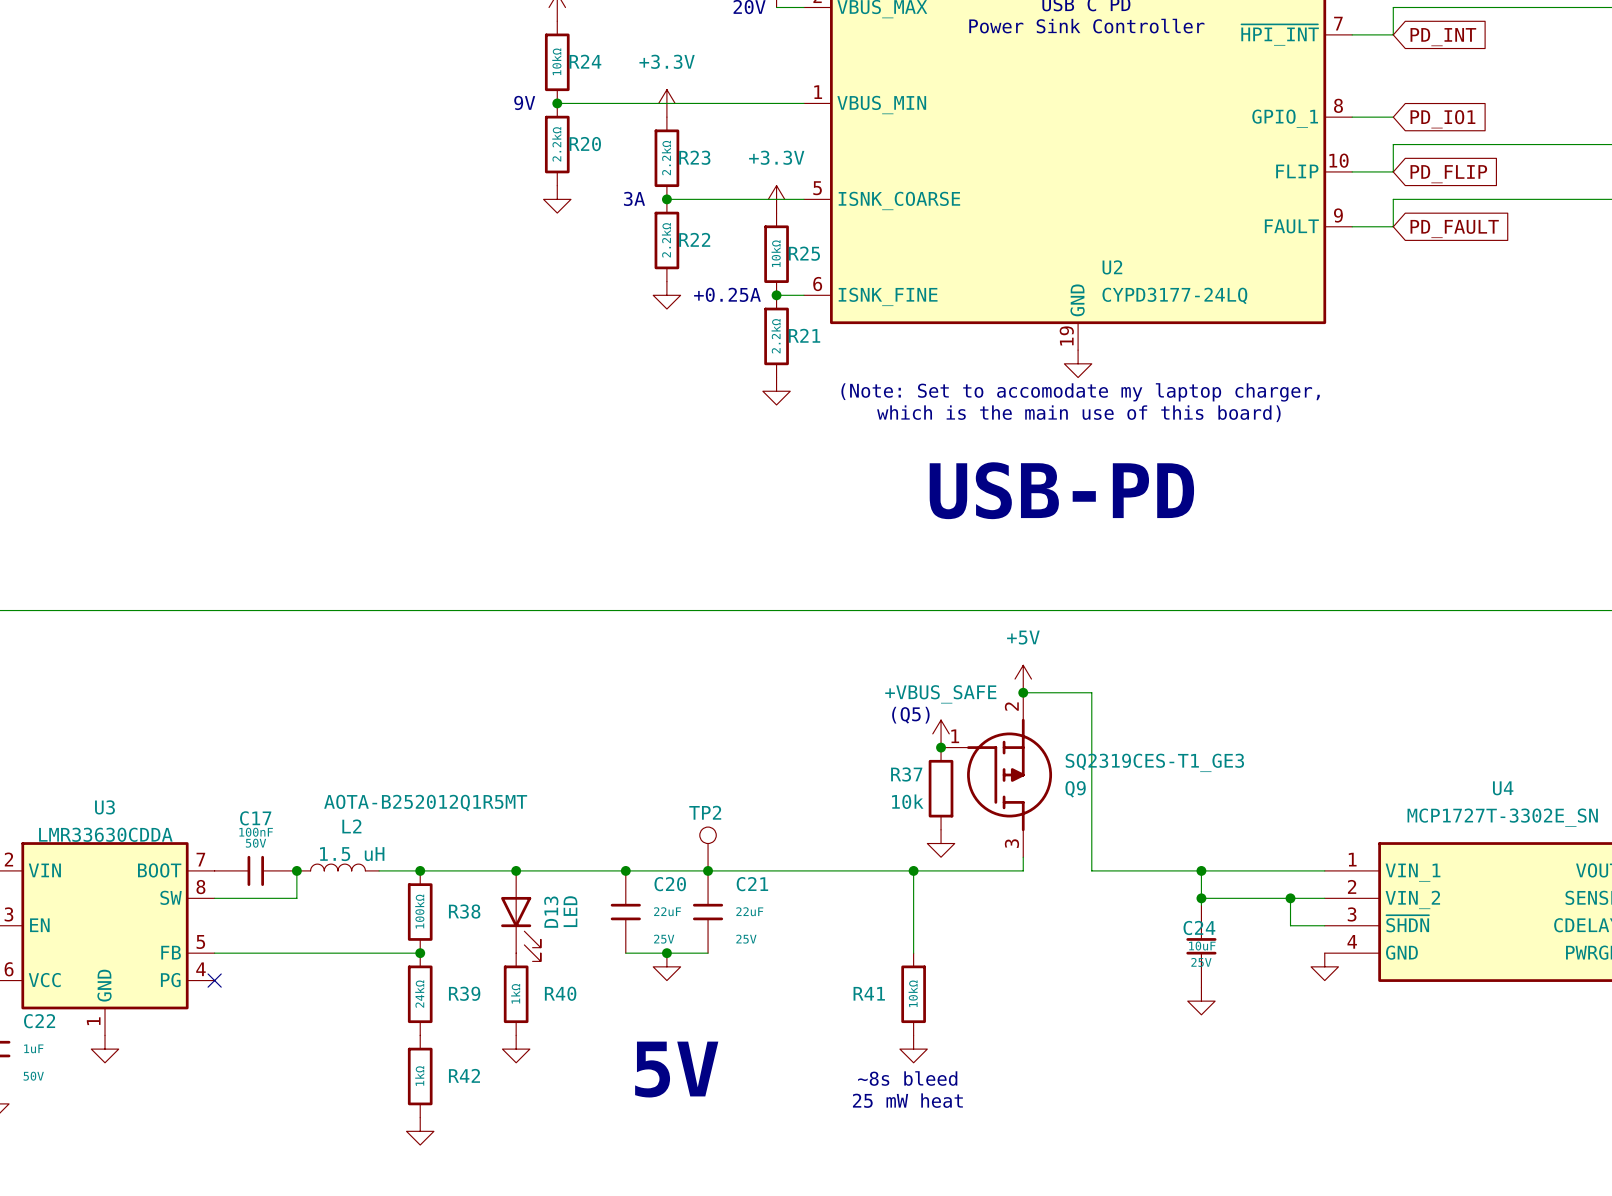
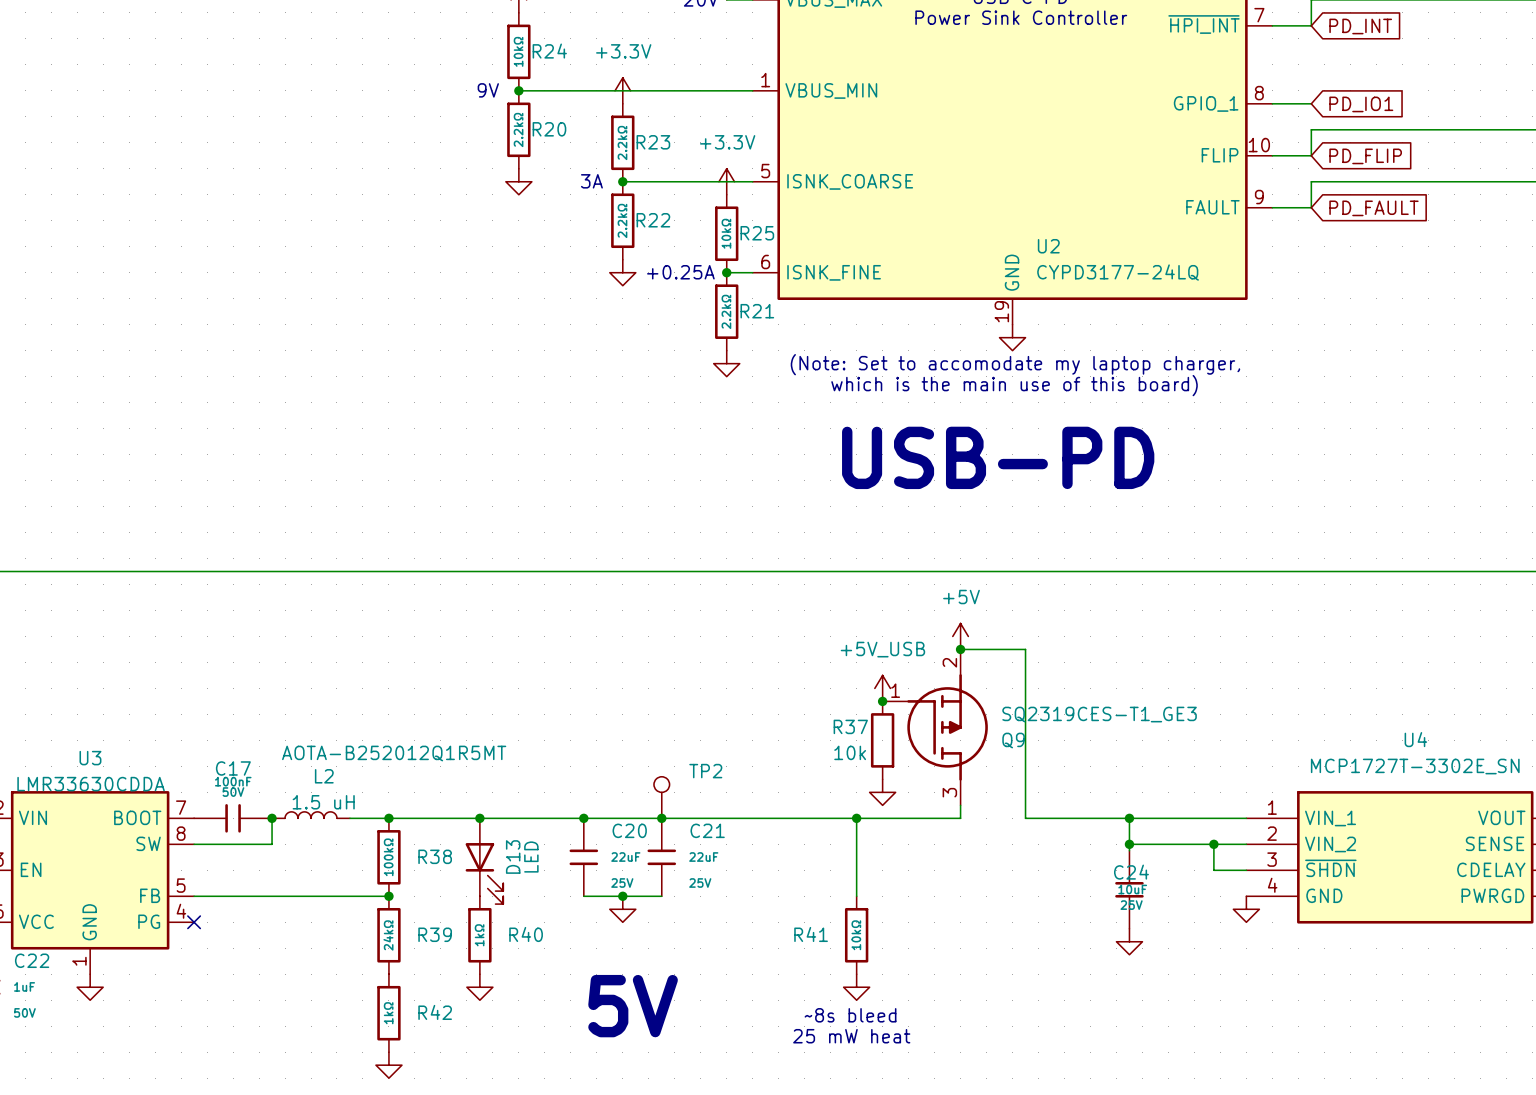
text: (Q5) (910, 715) -> none
power symbol: +VBUS_SAFE (941, 733) -> +5V_USB (882, 688)
TP2 name position: TP2 (705, 812) -> TP2 (705, 771)

